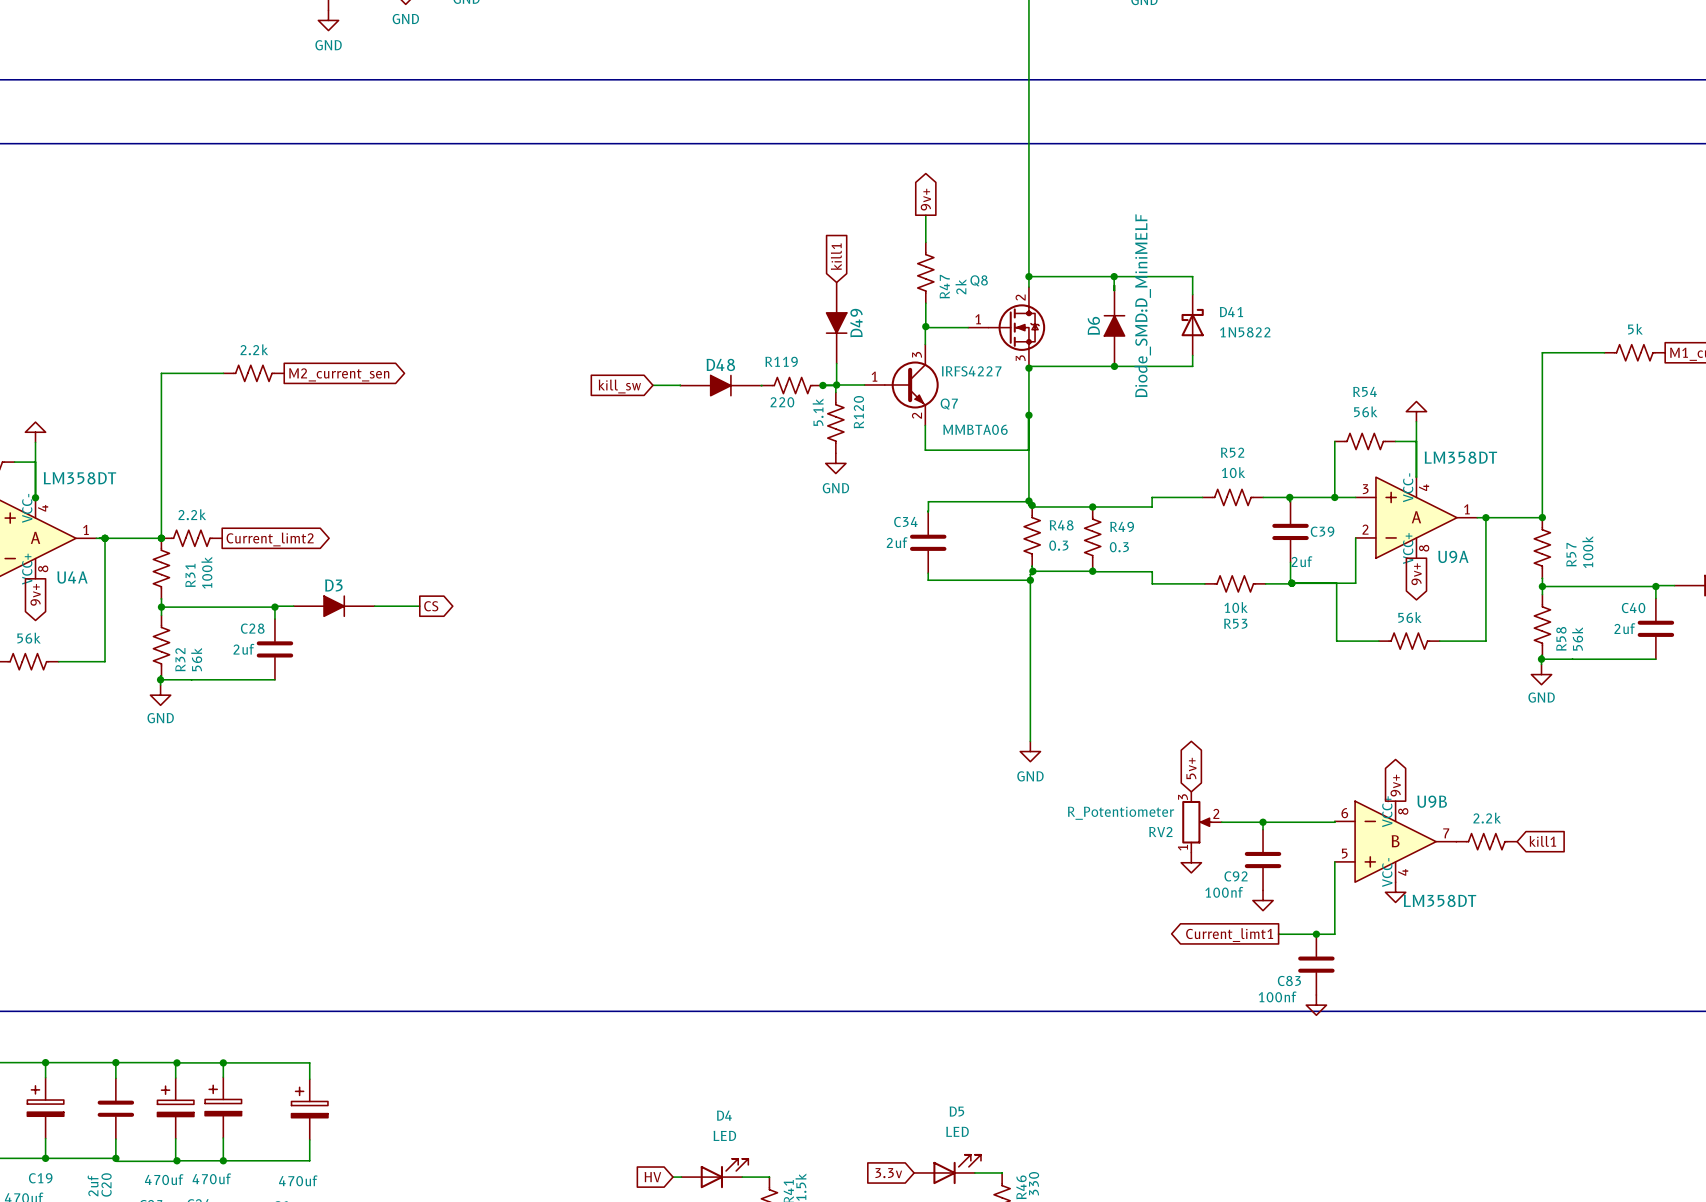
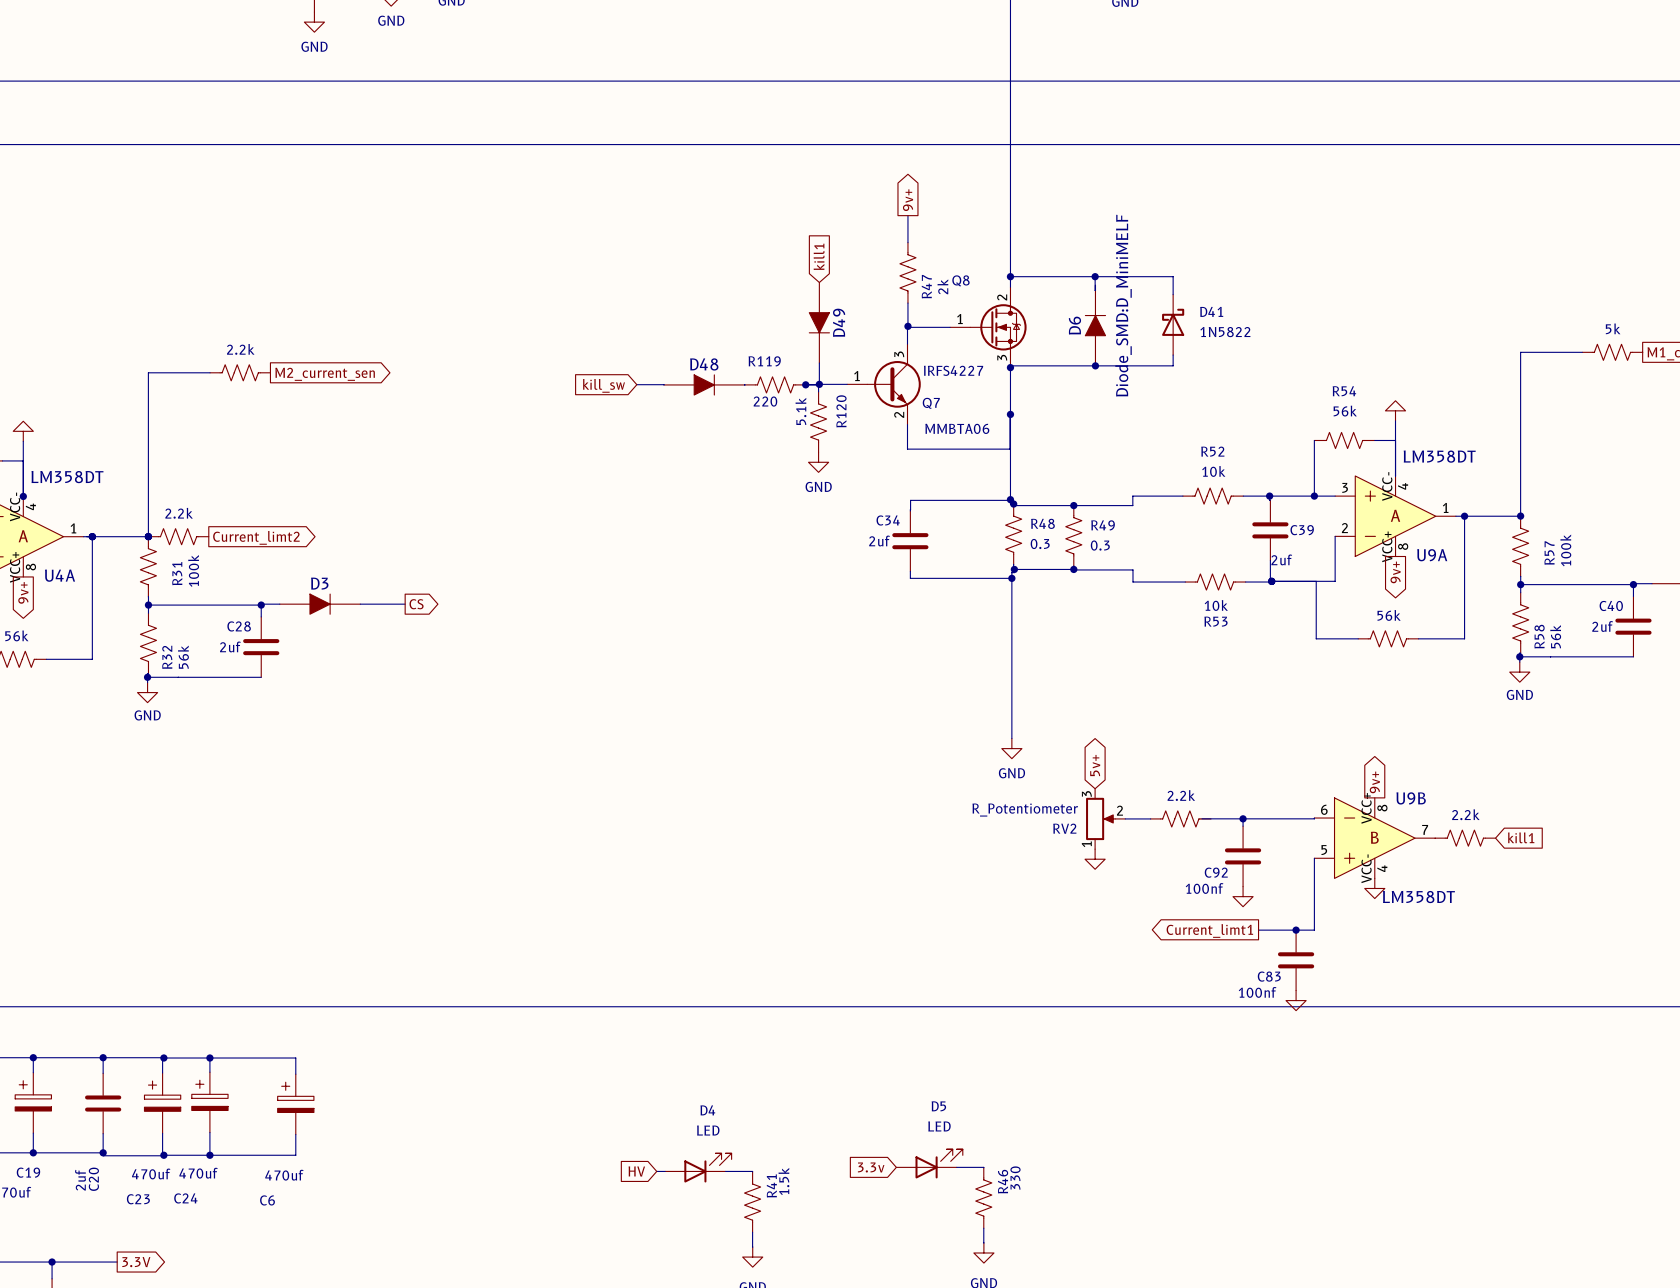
global label position: 5v+ (1191, 768) -> 5v+ (1095, 765)
wire: none -> (1125, 818) (1150, 818)
part: none -> 2.2k (1180, 818)
RV2 position: (1201, 822) -> (1105, 818)
power symbol position: (1191, 862) -> (1095, 859)

